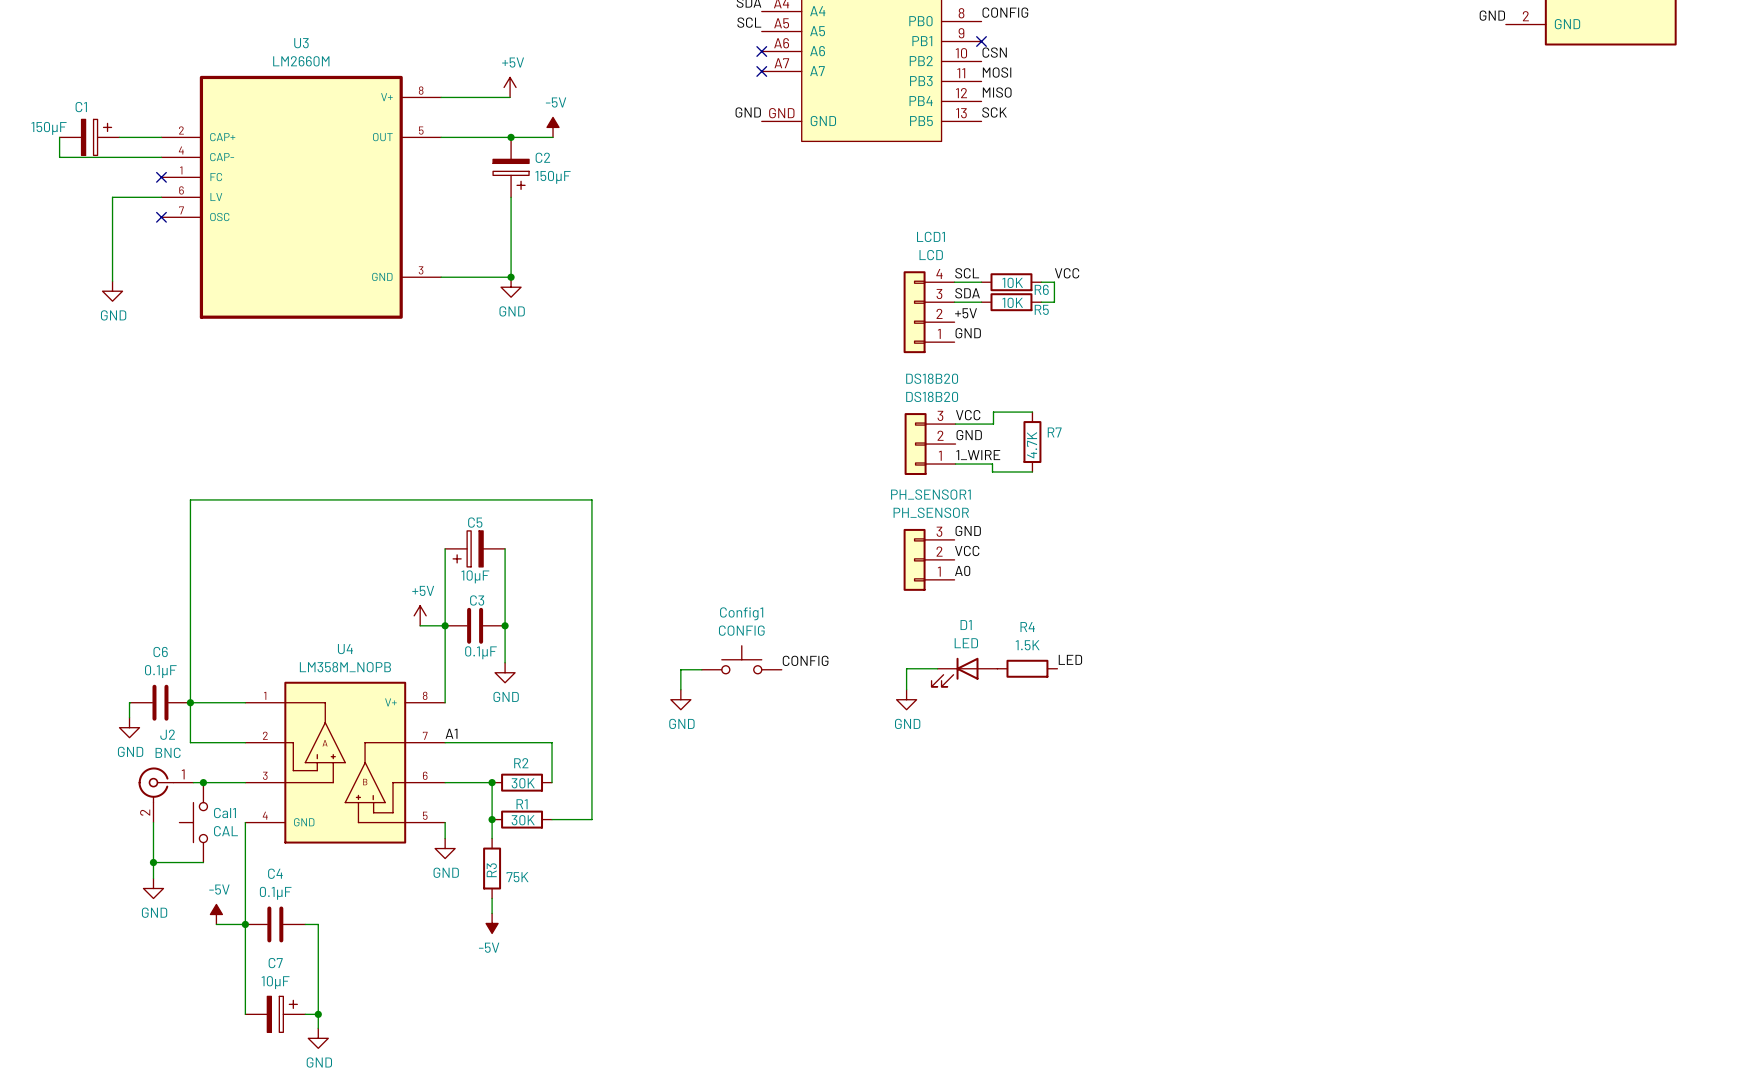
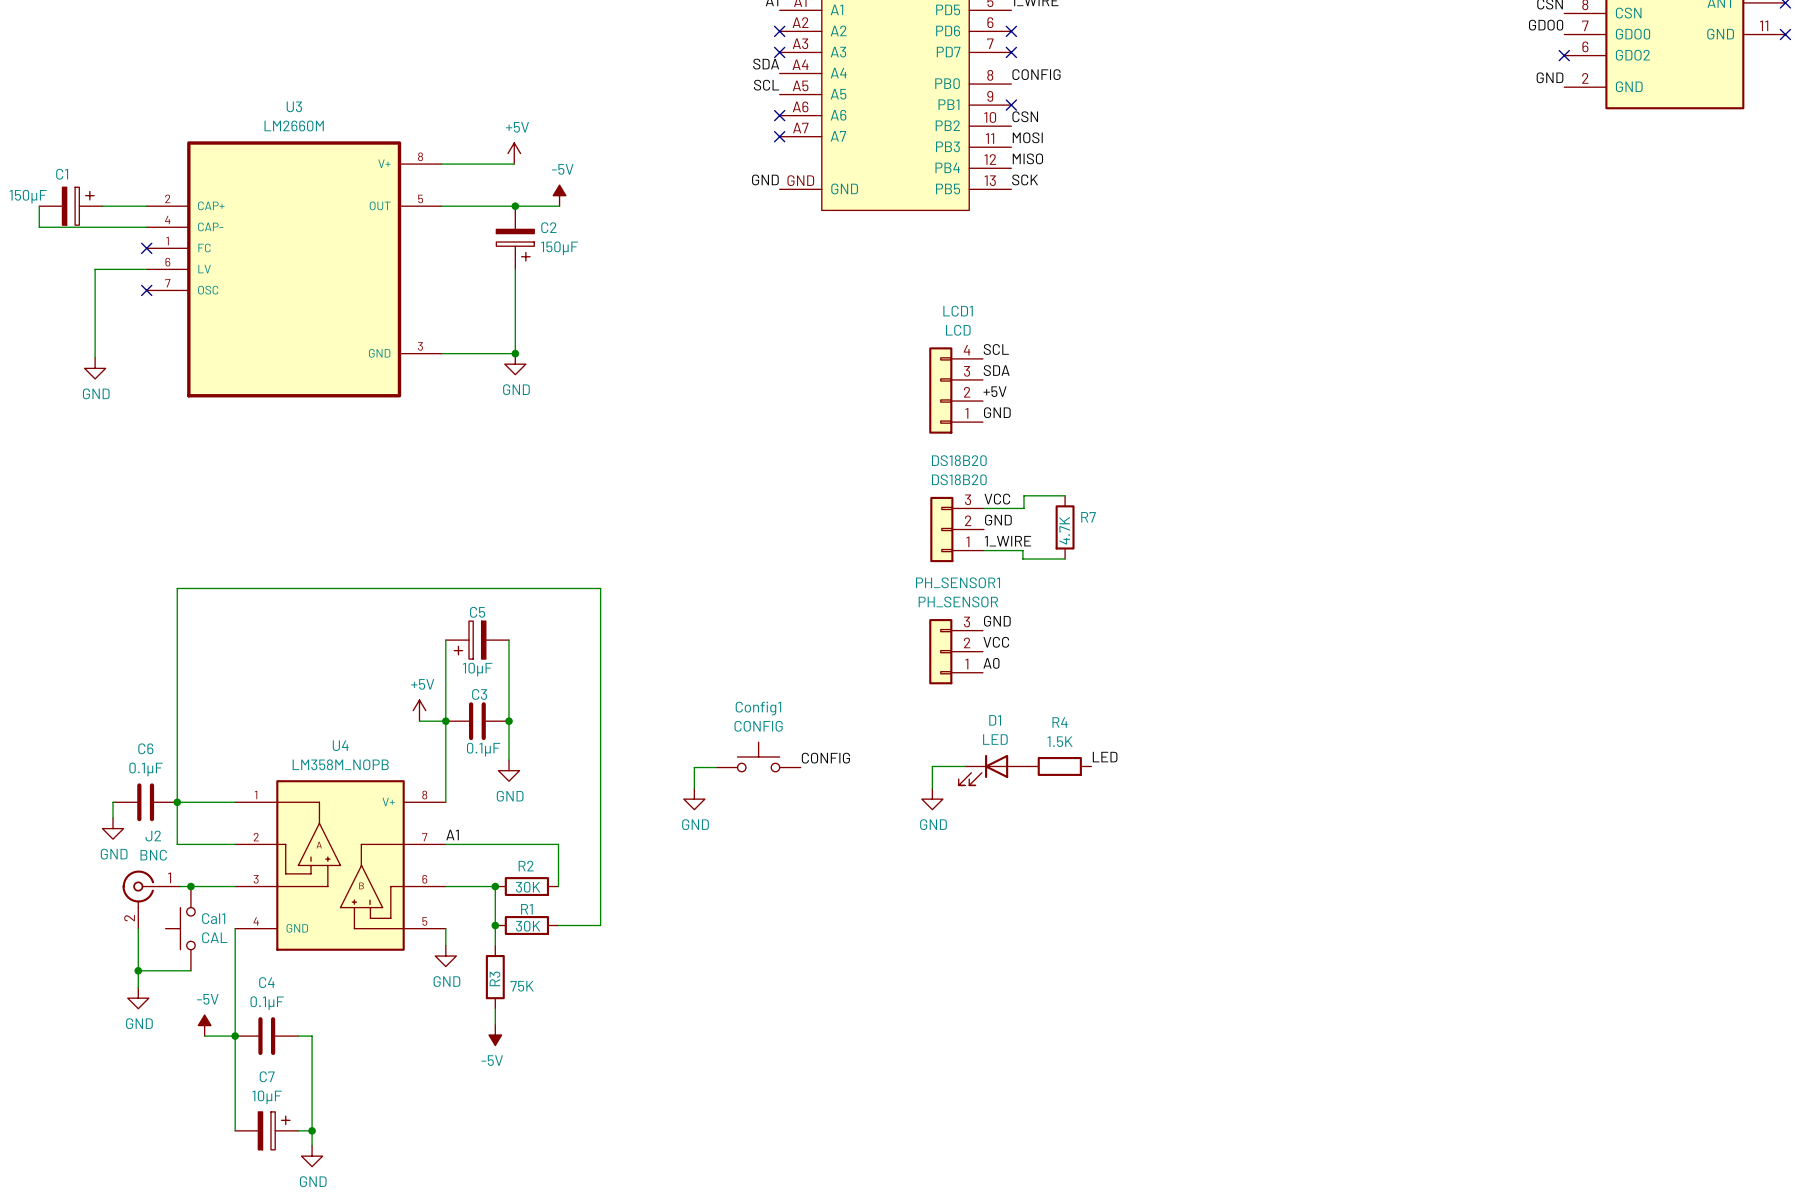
label: VCC (1067, 273) -> none
wire: (954, 282) (981, 282) -> none
R6: 10K (1011, 282) -> none
wire: (1041, 282) (1054, 282) (1054, 302) (1041, 302) -> none
wire: (954, 302) (981, 302) -> none
R5: 10K (1011, 302) -> none

